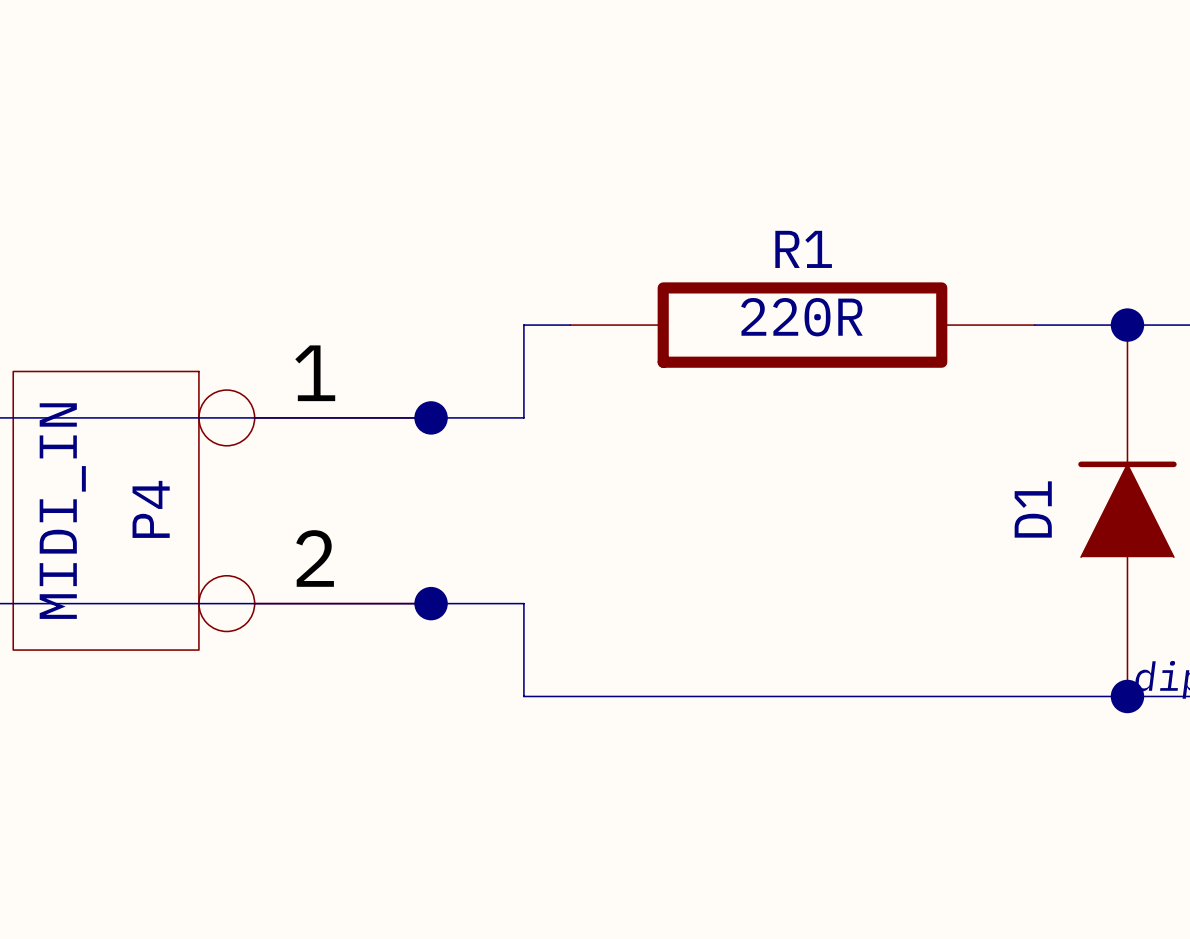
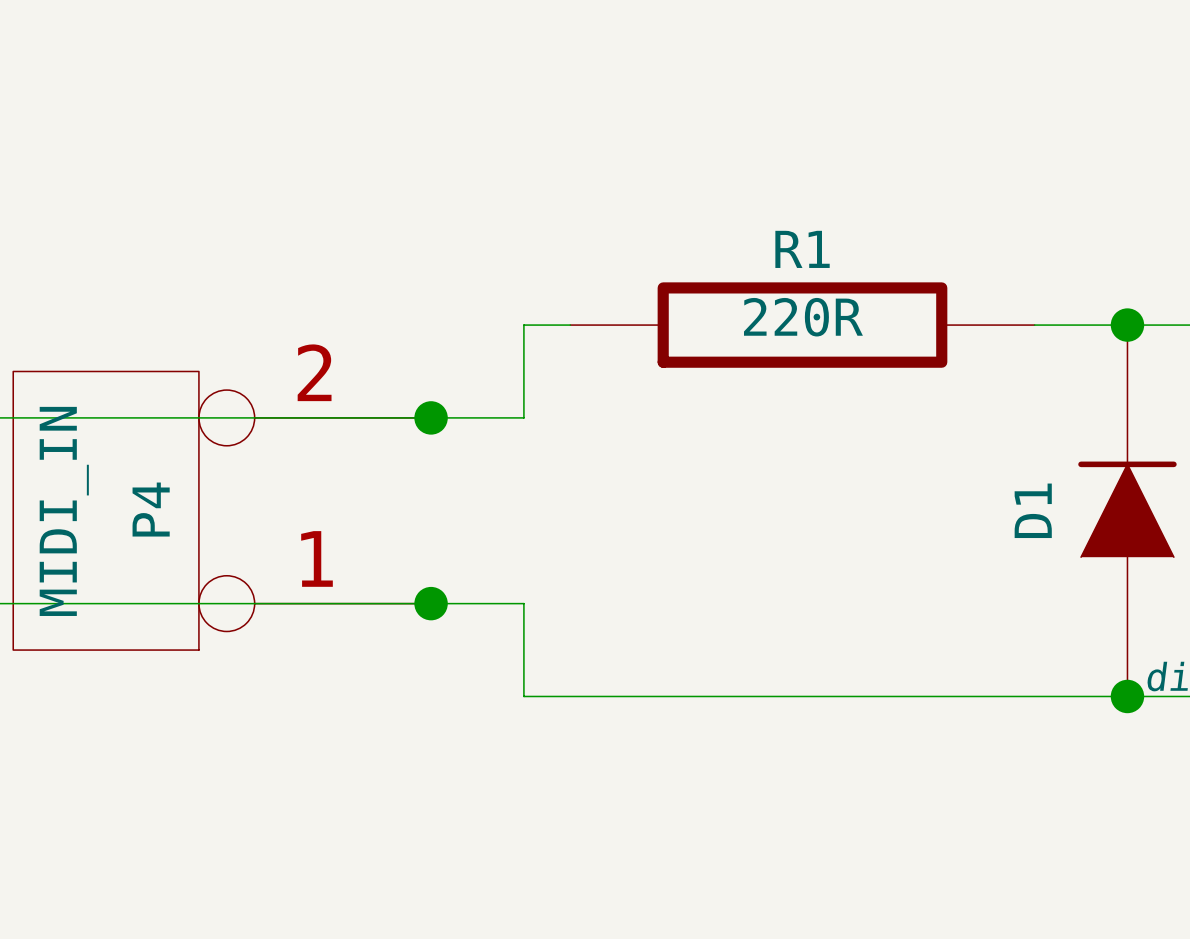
P4 flip: as is (106, 510) -> up-down (106, 510)

